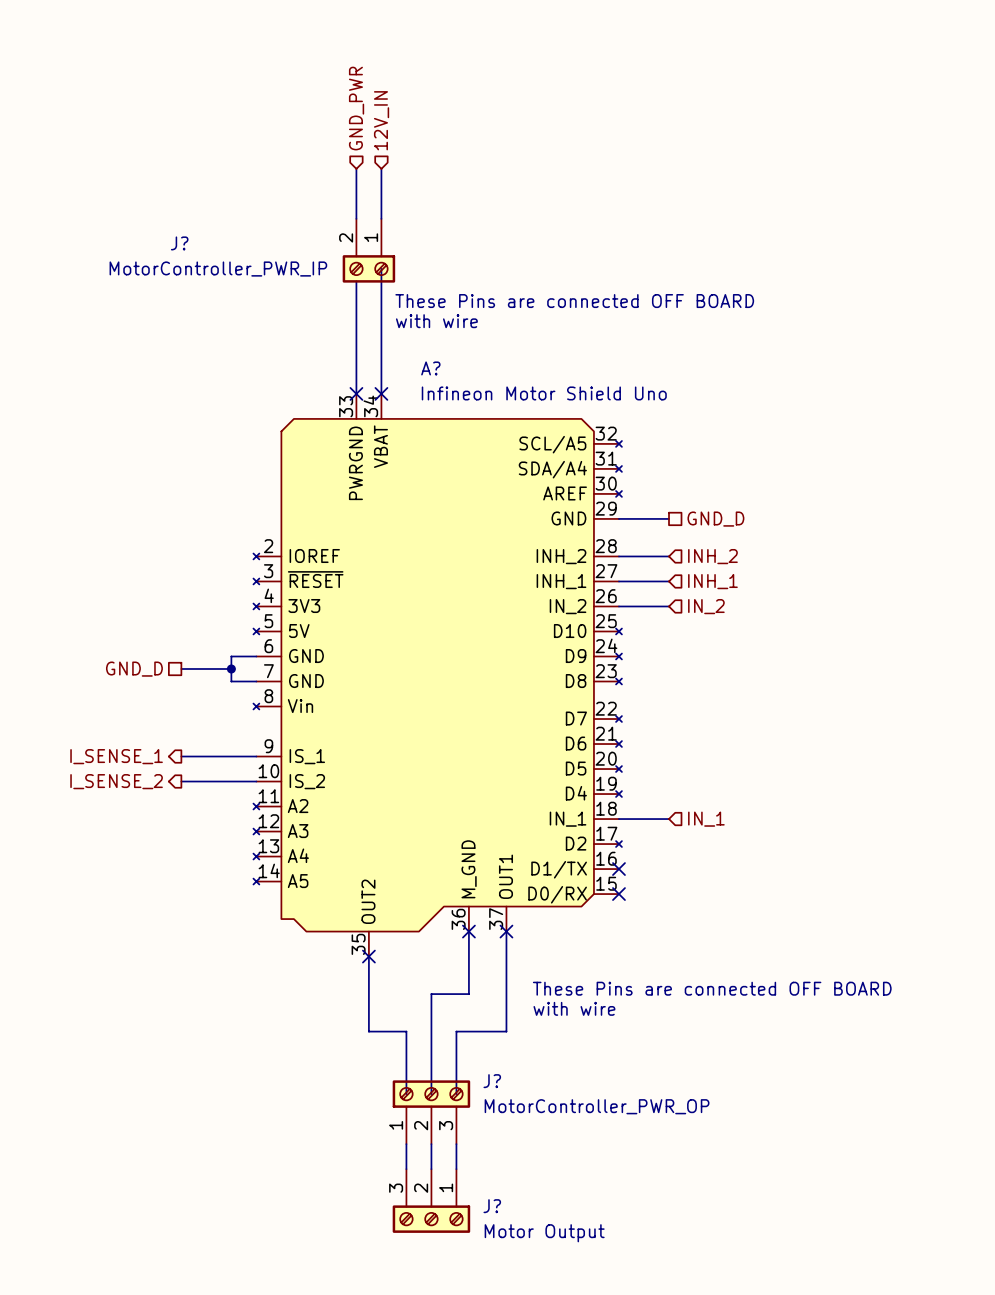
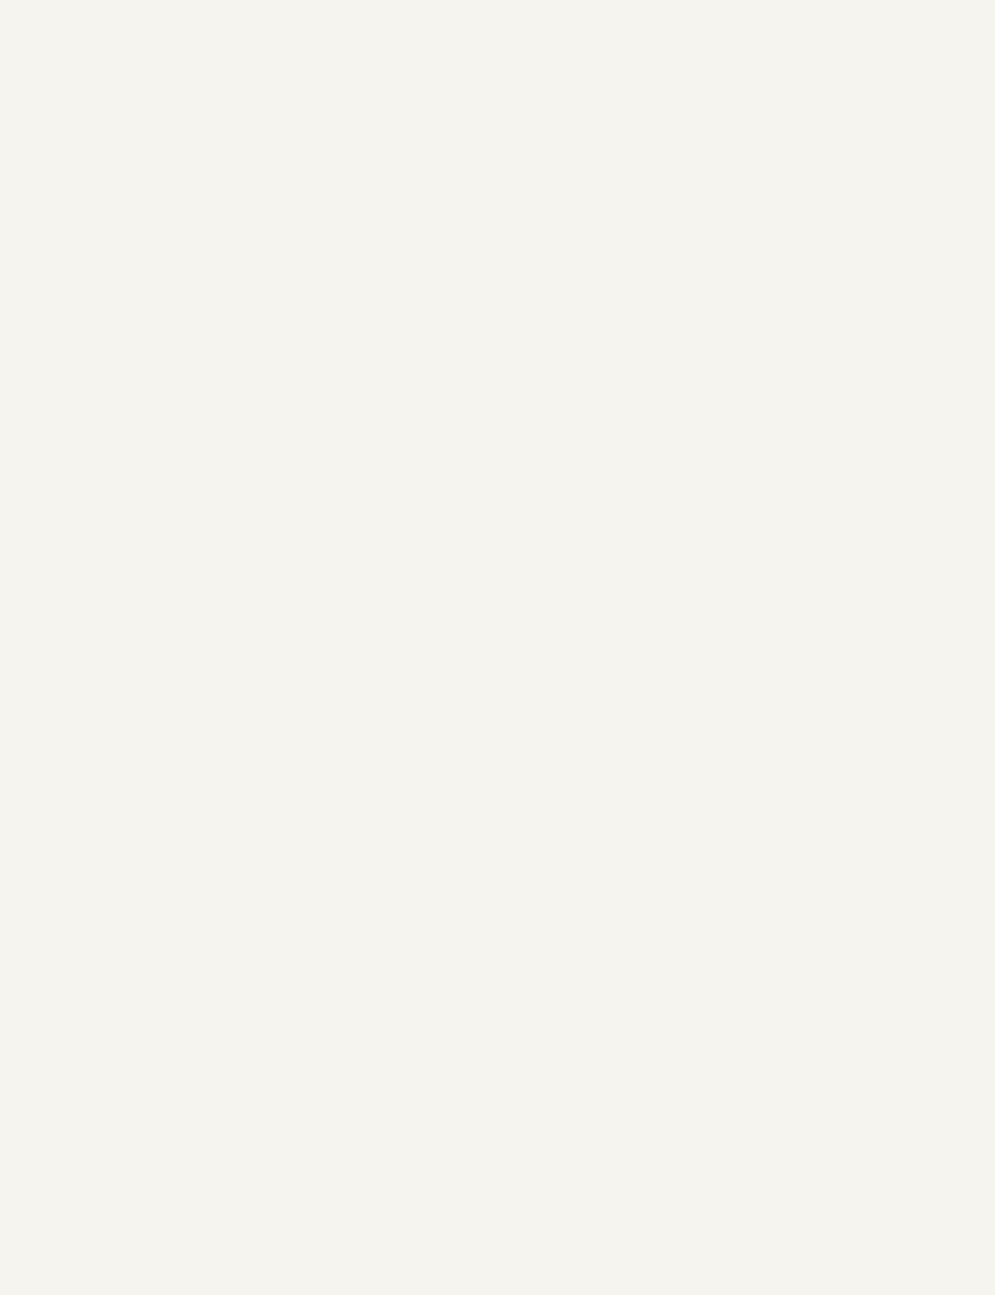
hierarchical label: GND_PWR (356, 108) -> none
hierarchical label: 12V_IN (381, 120) -> none
wire: (356, 168) (356, 218) -> none
wire: (381, 168) (381, 218) -> none
J?: MotorController_PWR_IP (368, 250) -> none
line: (381, 268) (381, 393) -> none
line: (356, 281) (356, 393) -> none
text: These Pins are connected OFF BOARD (574, 301) -> none
text: with wire (436, 321) -> none
no-connect mark: (356, 393) -> none
no-connect mark: (381, 393) -> none
wire: (618, 518) (668, 518) -> none
hierarchical label: GND_D (715, 519) -> none
wire: (618, 556) (668, 556) -> none
hierarchical label: INH_2 (712, 556) -> none
wire: (618, 581) (668, 581) -> none
hierarchical label: INH_1 (712, 581) -> none
wire: (618, 606) (668, 606) -> none
hierarchical label: IN_2 (706, 606) -> none
wire: (256, 656) (231, 656) (231, 681) (256, 681) -> none
wire: (181, 668) (231, 668) -> none
junction: (231, 668) -> none
hierarchical label: GND_D (134, 669) -> none
A?: Infineon Motor Shield Uno (437, 675) -> none
hierarchical label: I_SENSE_1 (116, 756) -> none
wire: (181, 756) (256, 756) -> none
hierarchical label: I_SENSE_2 (116, 781) -> none
wire: (181, 781) (256, 781) -> none
wire: (618, 819) (668, 819) -> none
hierarchical label: IN_1 (706, 819) -> none
no-connect mark: (618, 869) -> none
no-connect mark: (618, 894) -> none
line: (468, 931) (468, 994) (431, 994) (431, 1094) -> none
no-connect mark: (468, 931) -> none
line: (506, 931) (506, 1031) (456, 1031) (456, 1094) -> none
no-connect mark: (506, 931) -> none
line: (368, 956) (368, 1031) (406, 1031) (406, 1094) -> none
no-connect mark: (368, 956) -> none
text: These Pins are connected OFF BOARD (712, 988) -> none
text: with wire (574, 1008) -> none
J?: MotorController_PWR_OP (431, 1112) -> none
wire: (406, 1144) (406, 1169) -> none
wire: (431, 1144) (431, 1169) -> none
wire: (456, 1144) (456, 1169) -> none
J?: Motor Output (431, 1201) -> none

